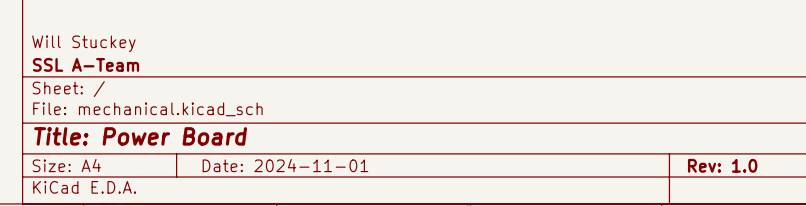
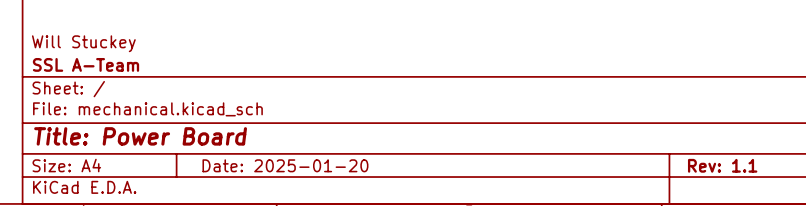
title block: Date: 2024-11-01 (285, 165) -> Date: 2025-01-20 (285, 165)
title block: Rev: 1.0 (722, 165) -> Rev: 1.1 (722, 165)

